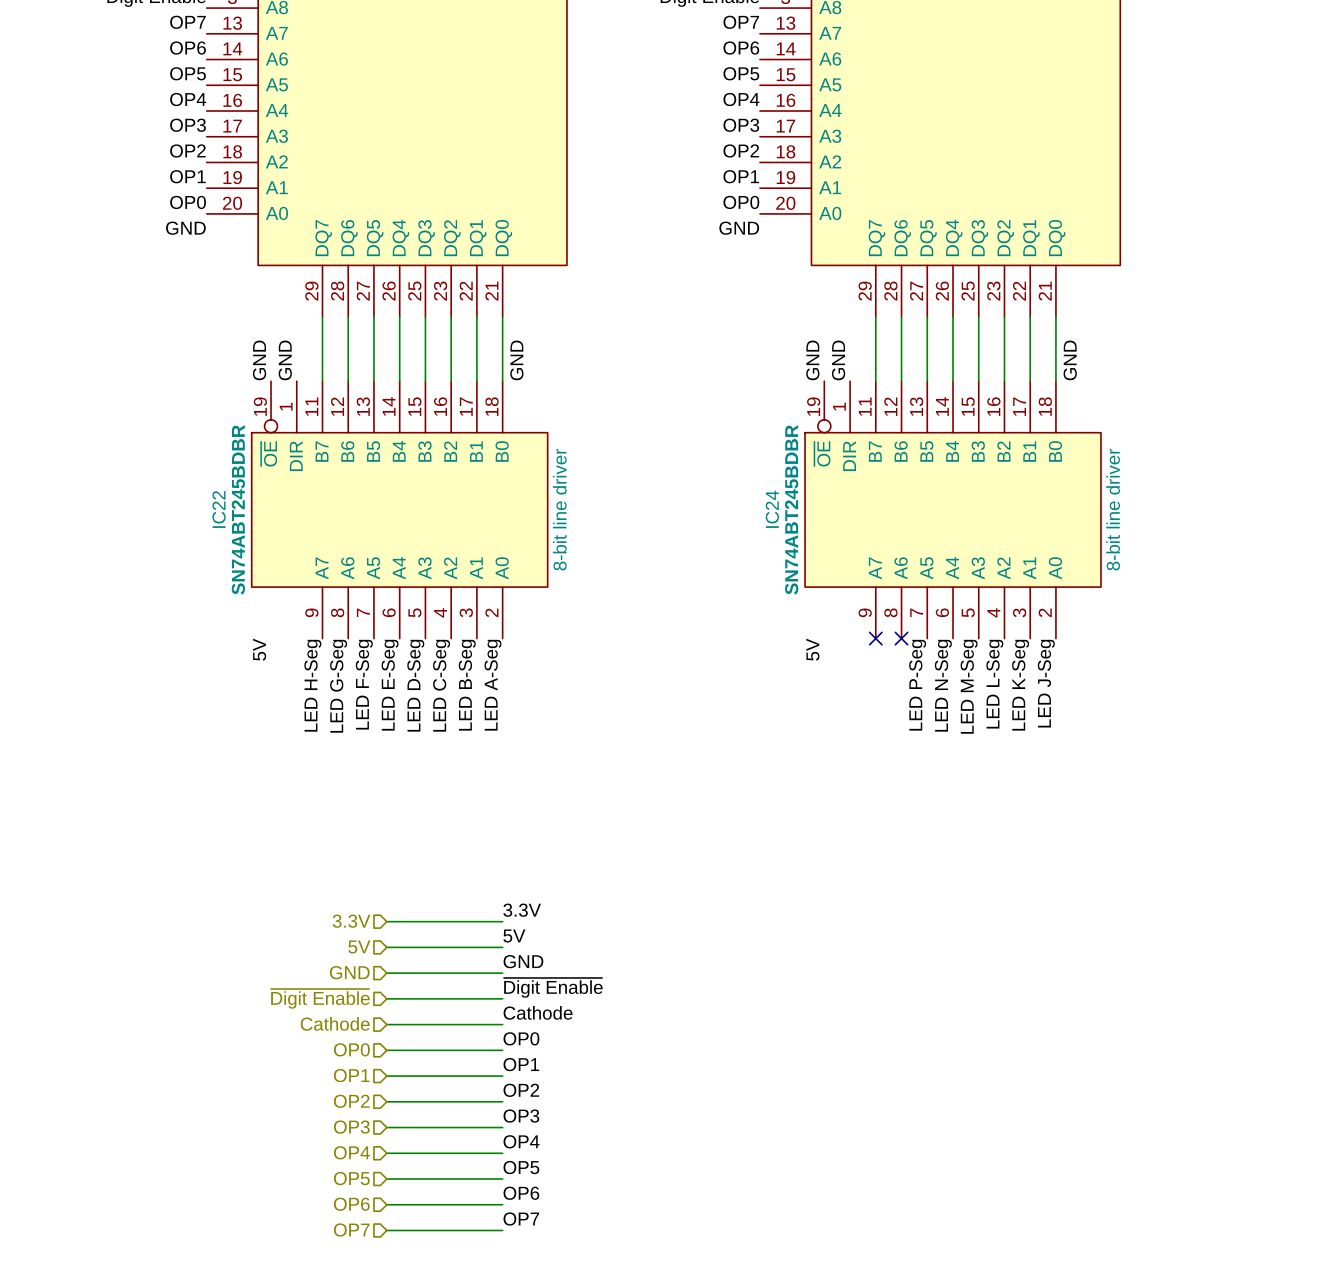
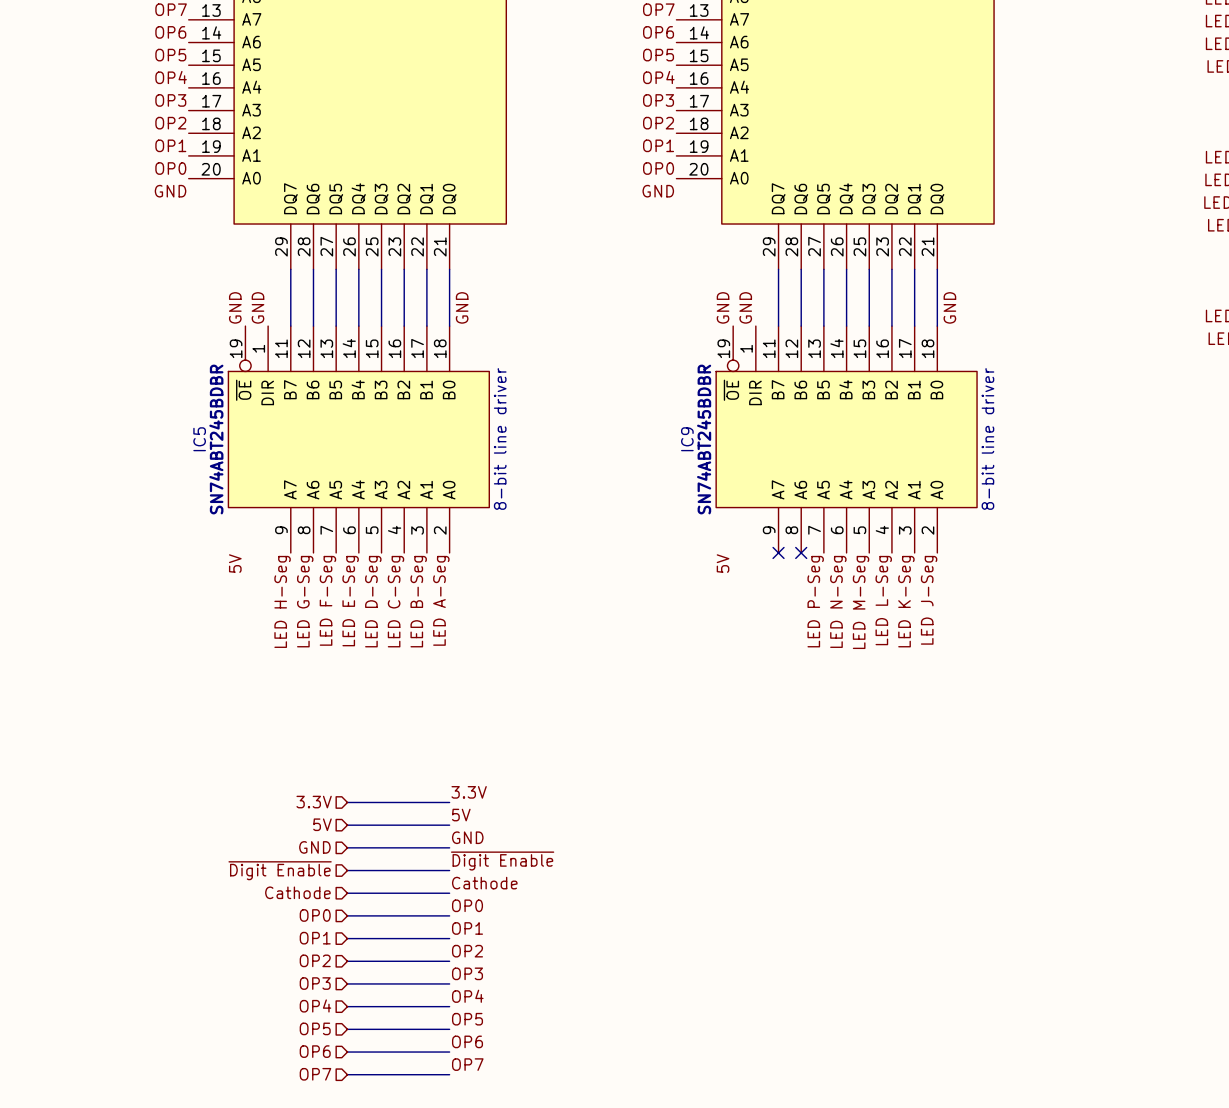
IC22 name: IC22 (219, 509) -> IC5 (199, 439)
IC24 name: IC24 (772, 509) -> IC9 (687, 439)

